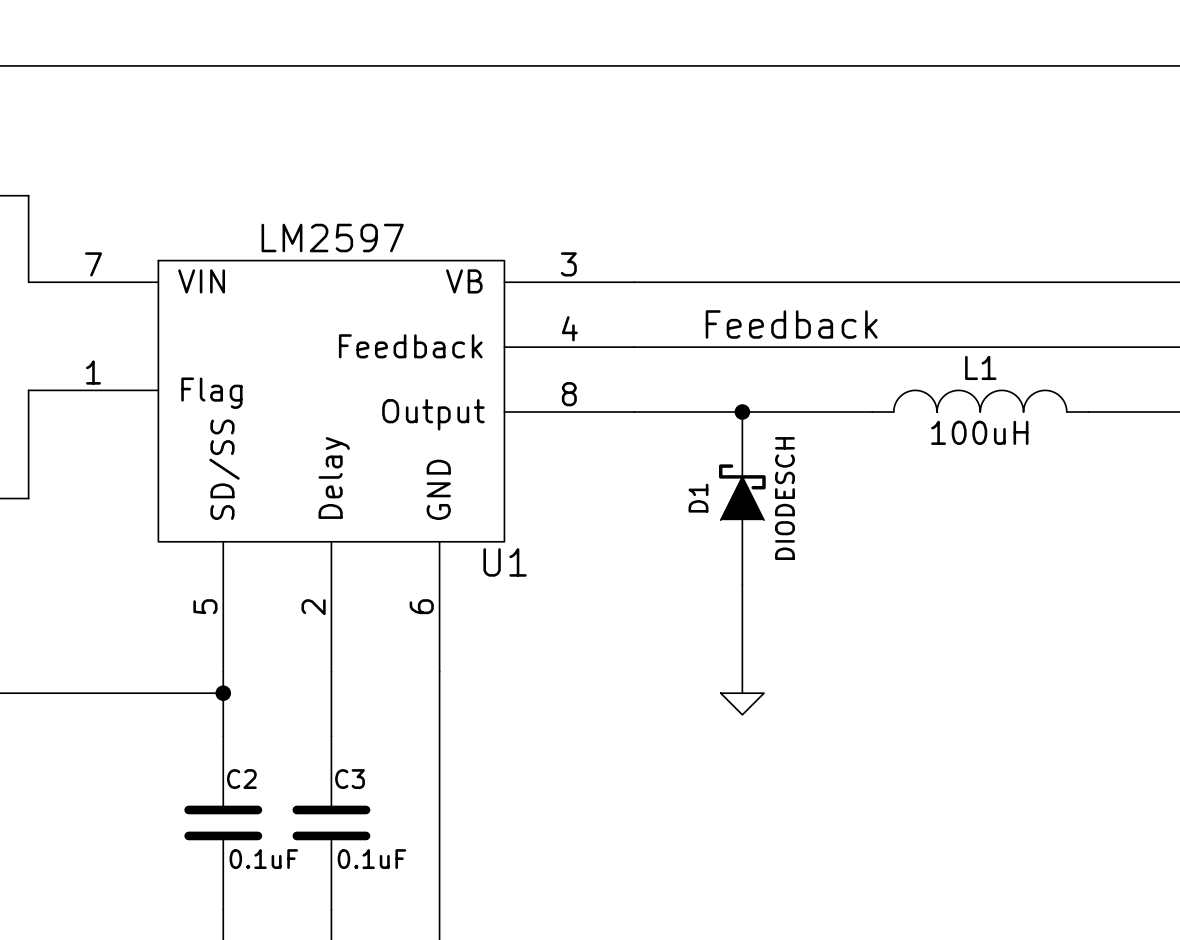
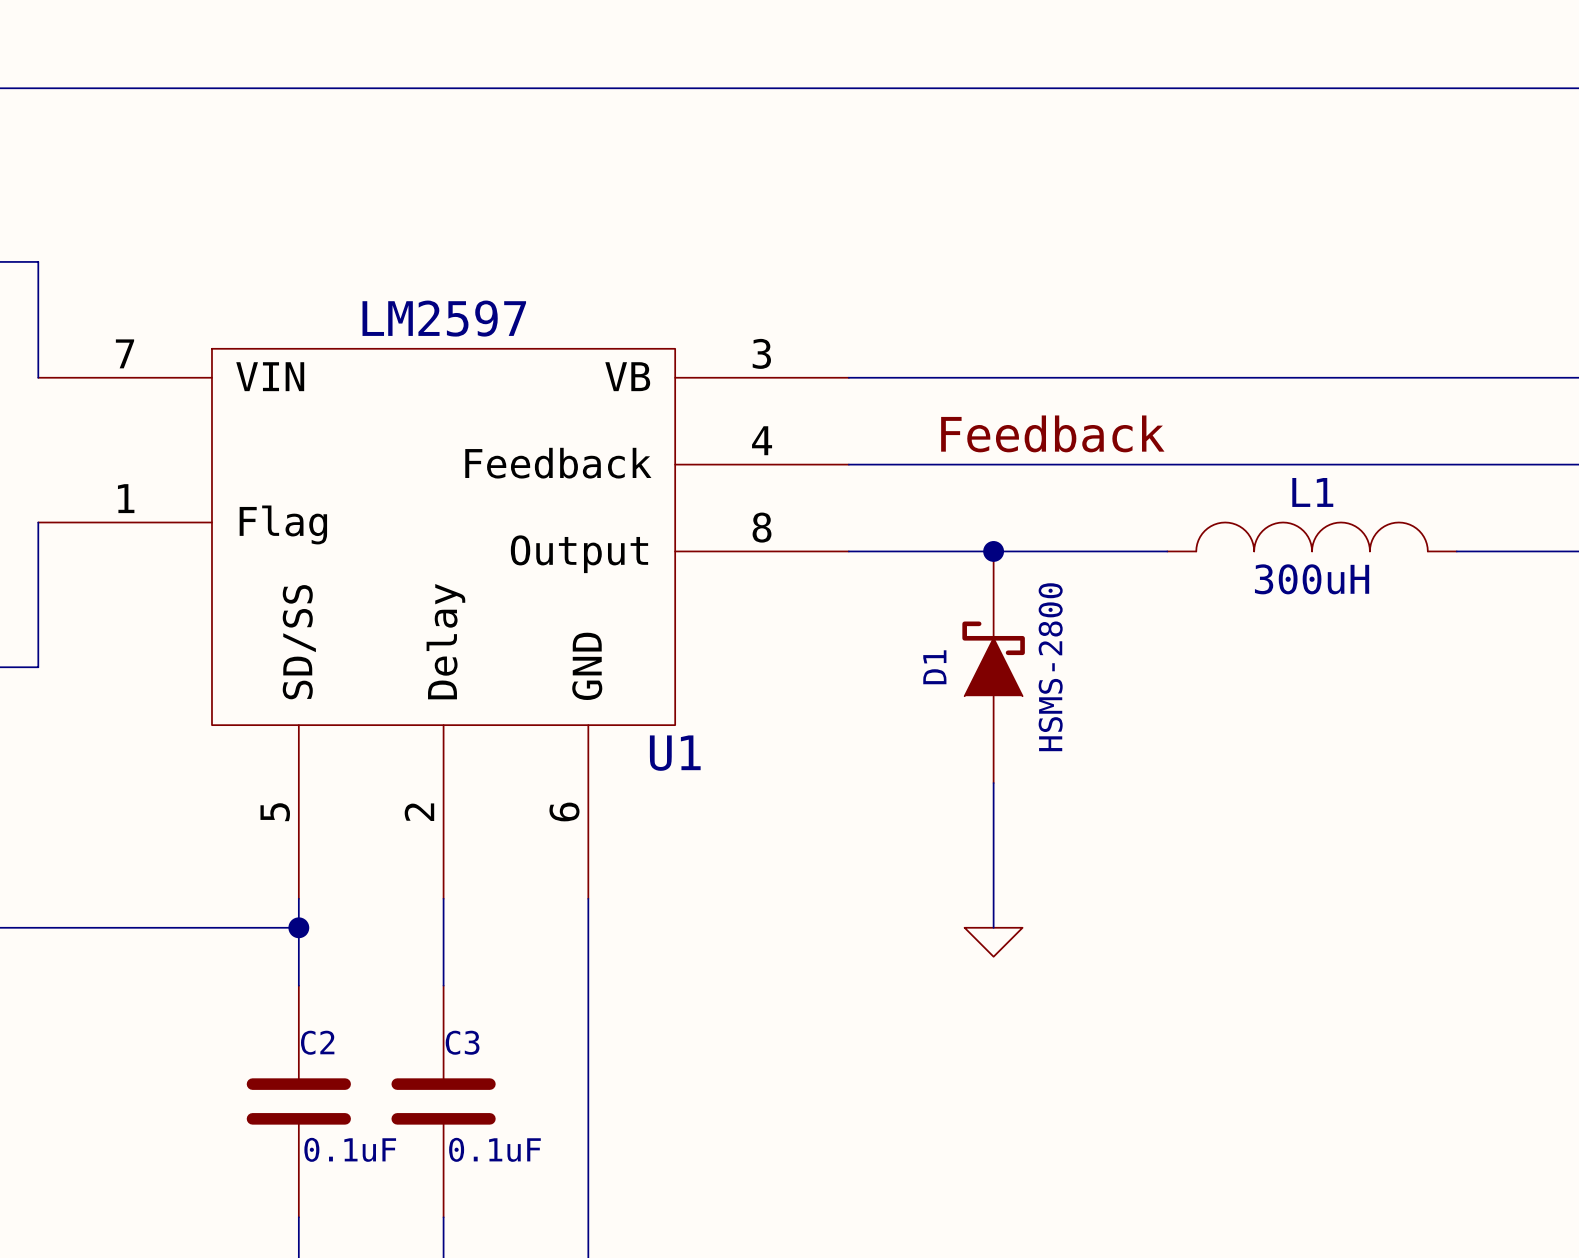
L1 value: 100uH (979, 432) -> 300uH (1312, 579)
D1 value: DIODESCH (784, 498) -> HSMS-2800 (1050, 667)

